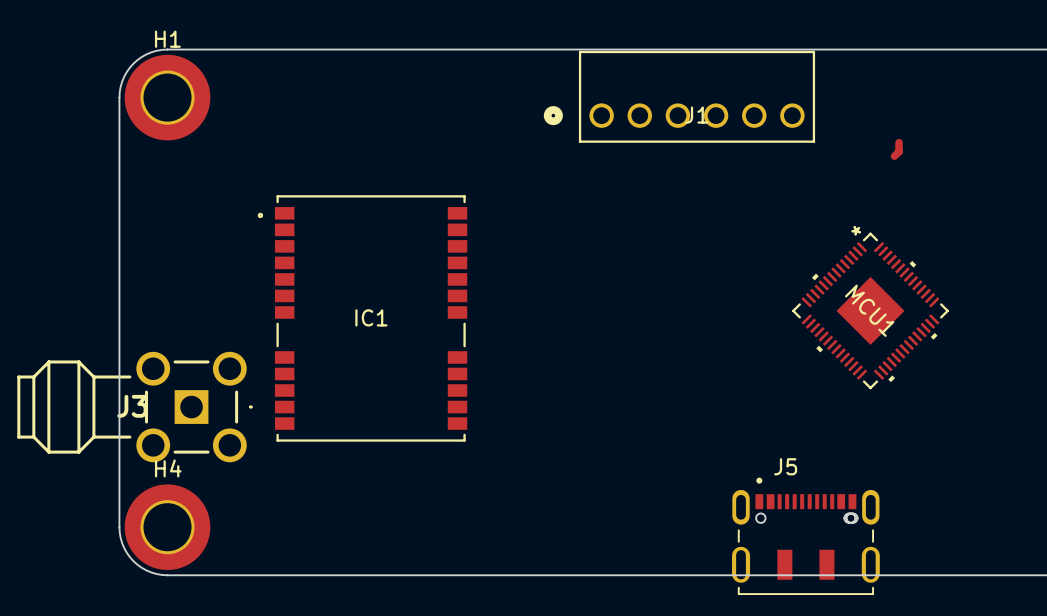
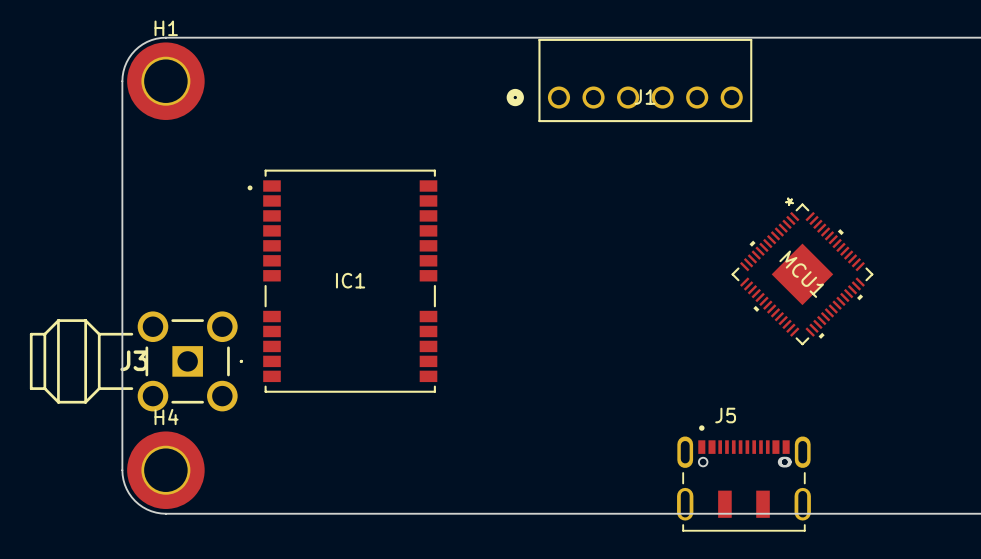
track: (899, 142) (899, 151) (894, 156) -> none

